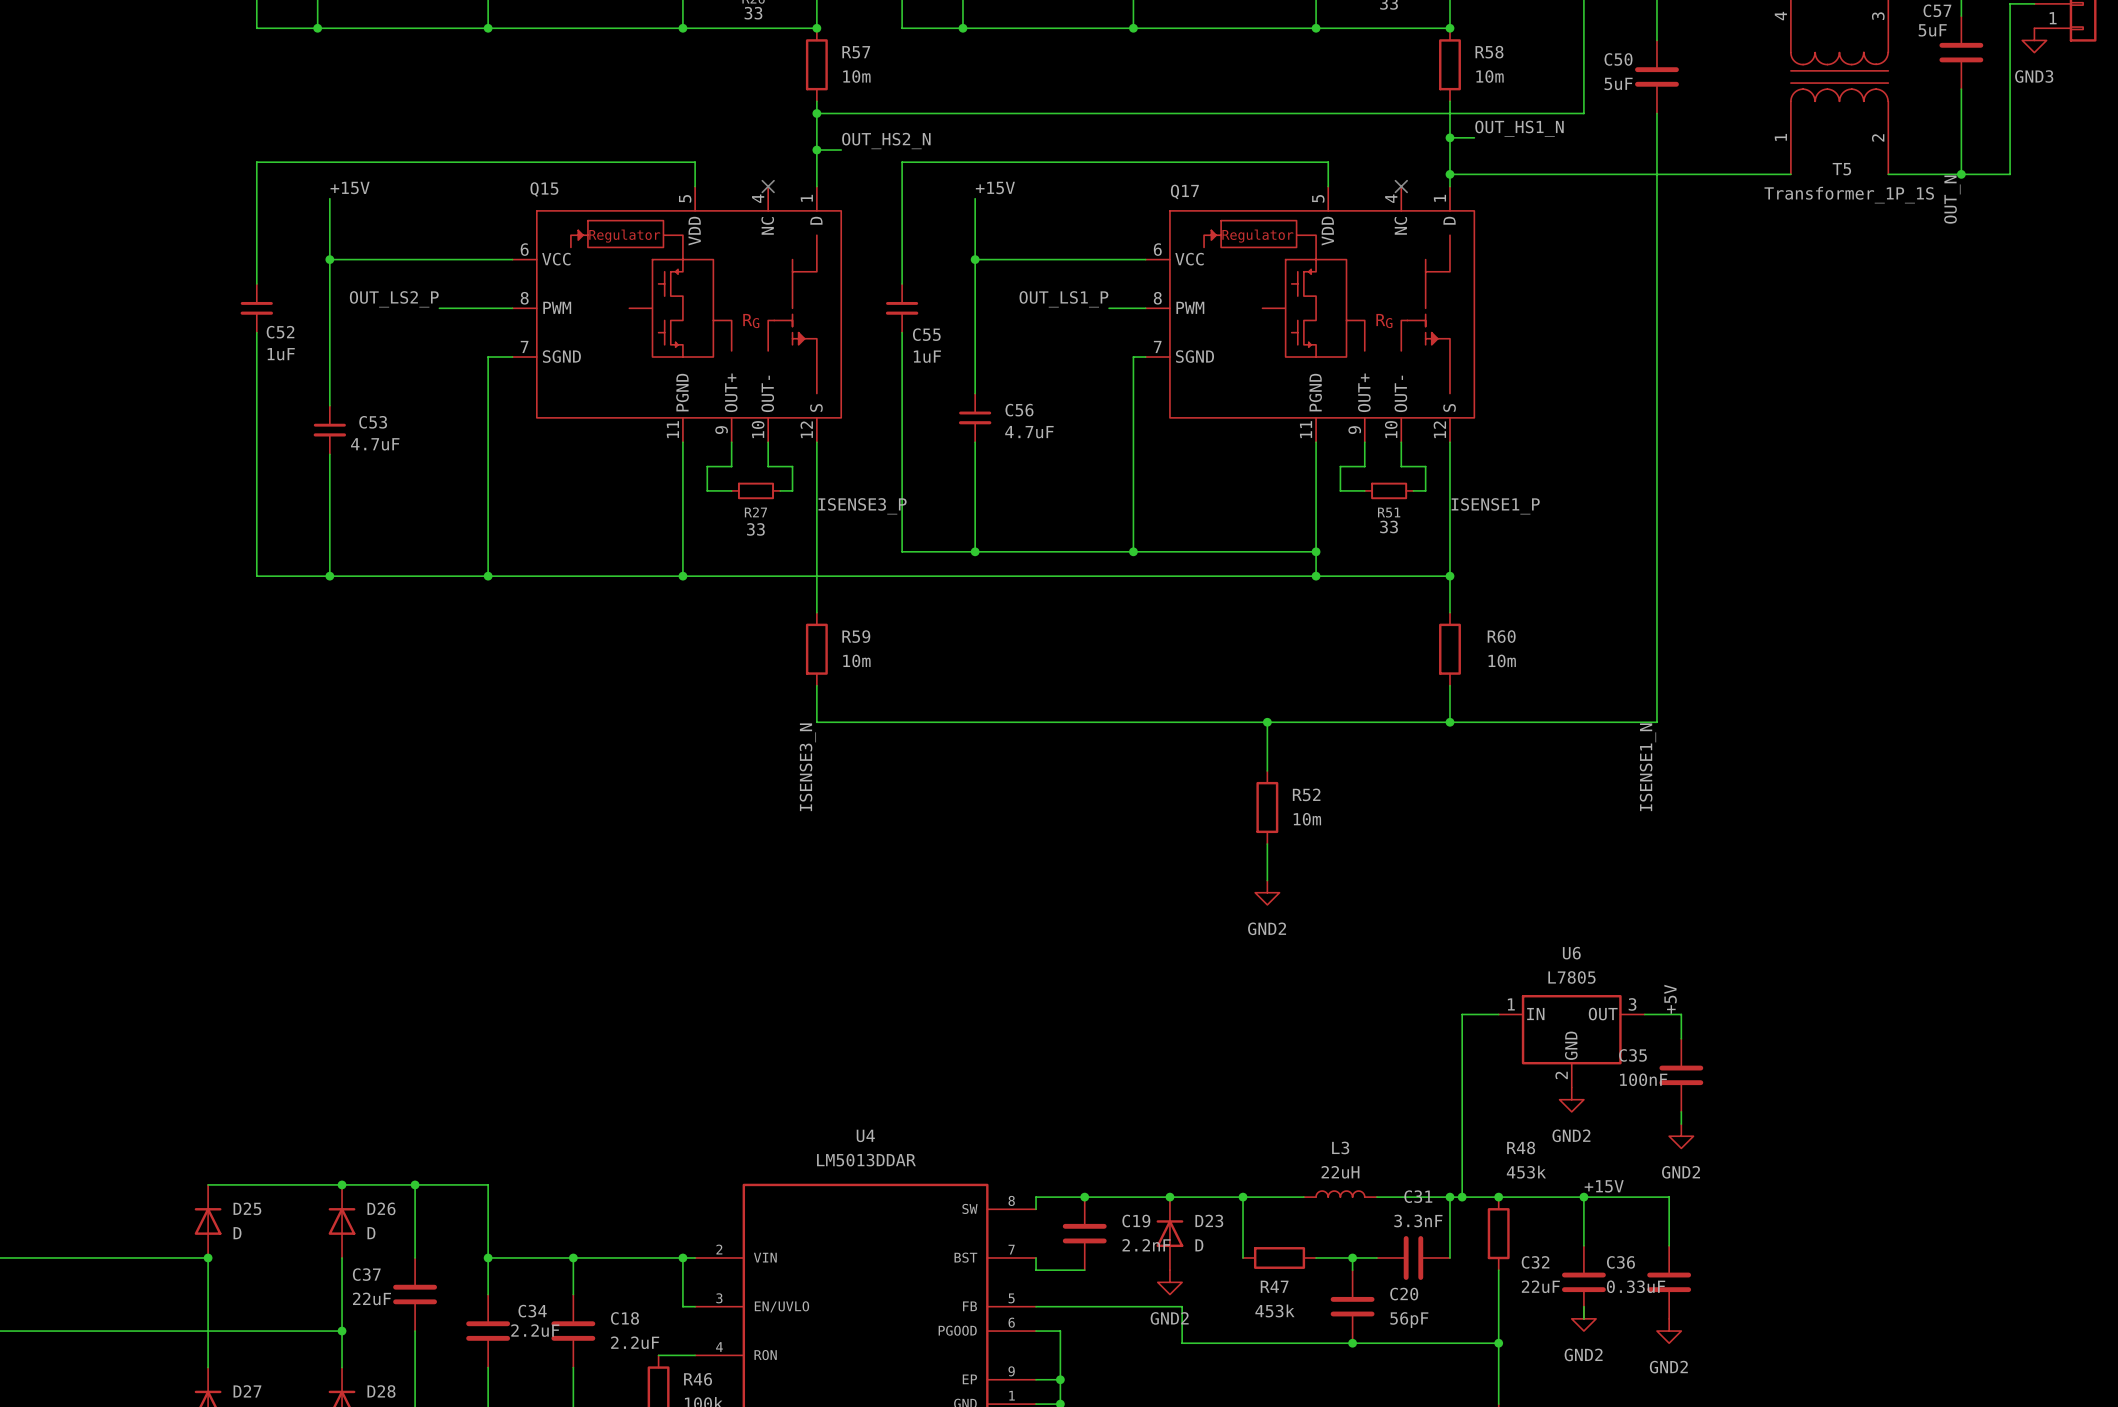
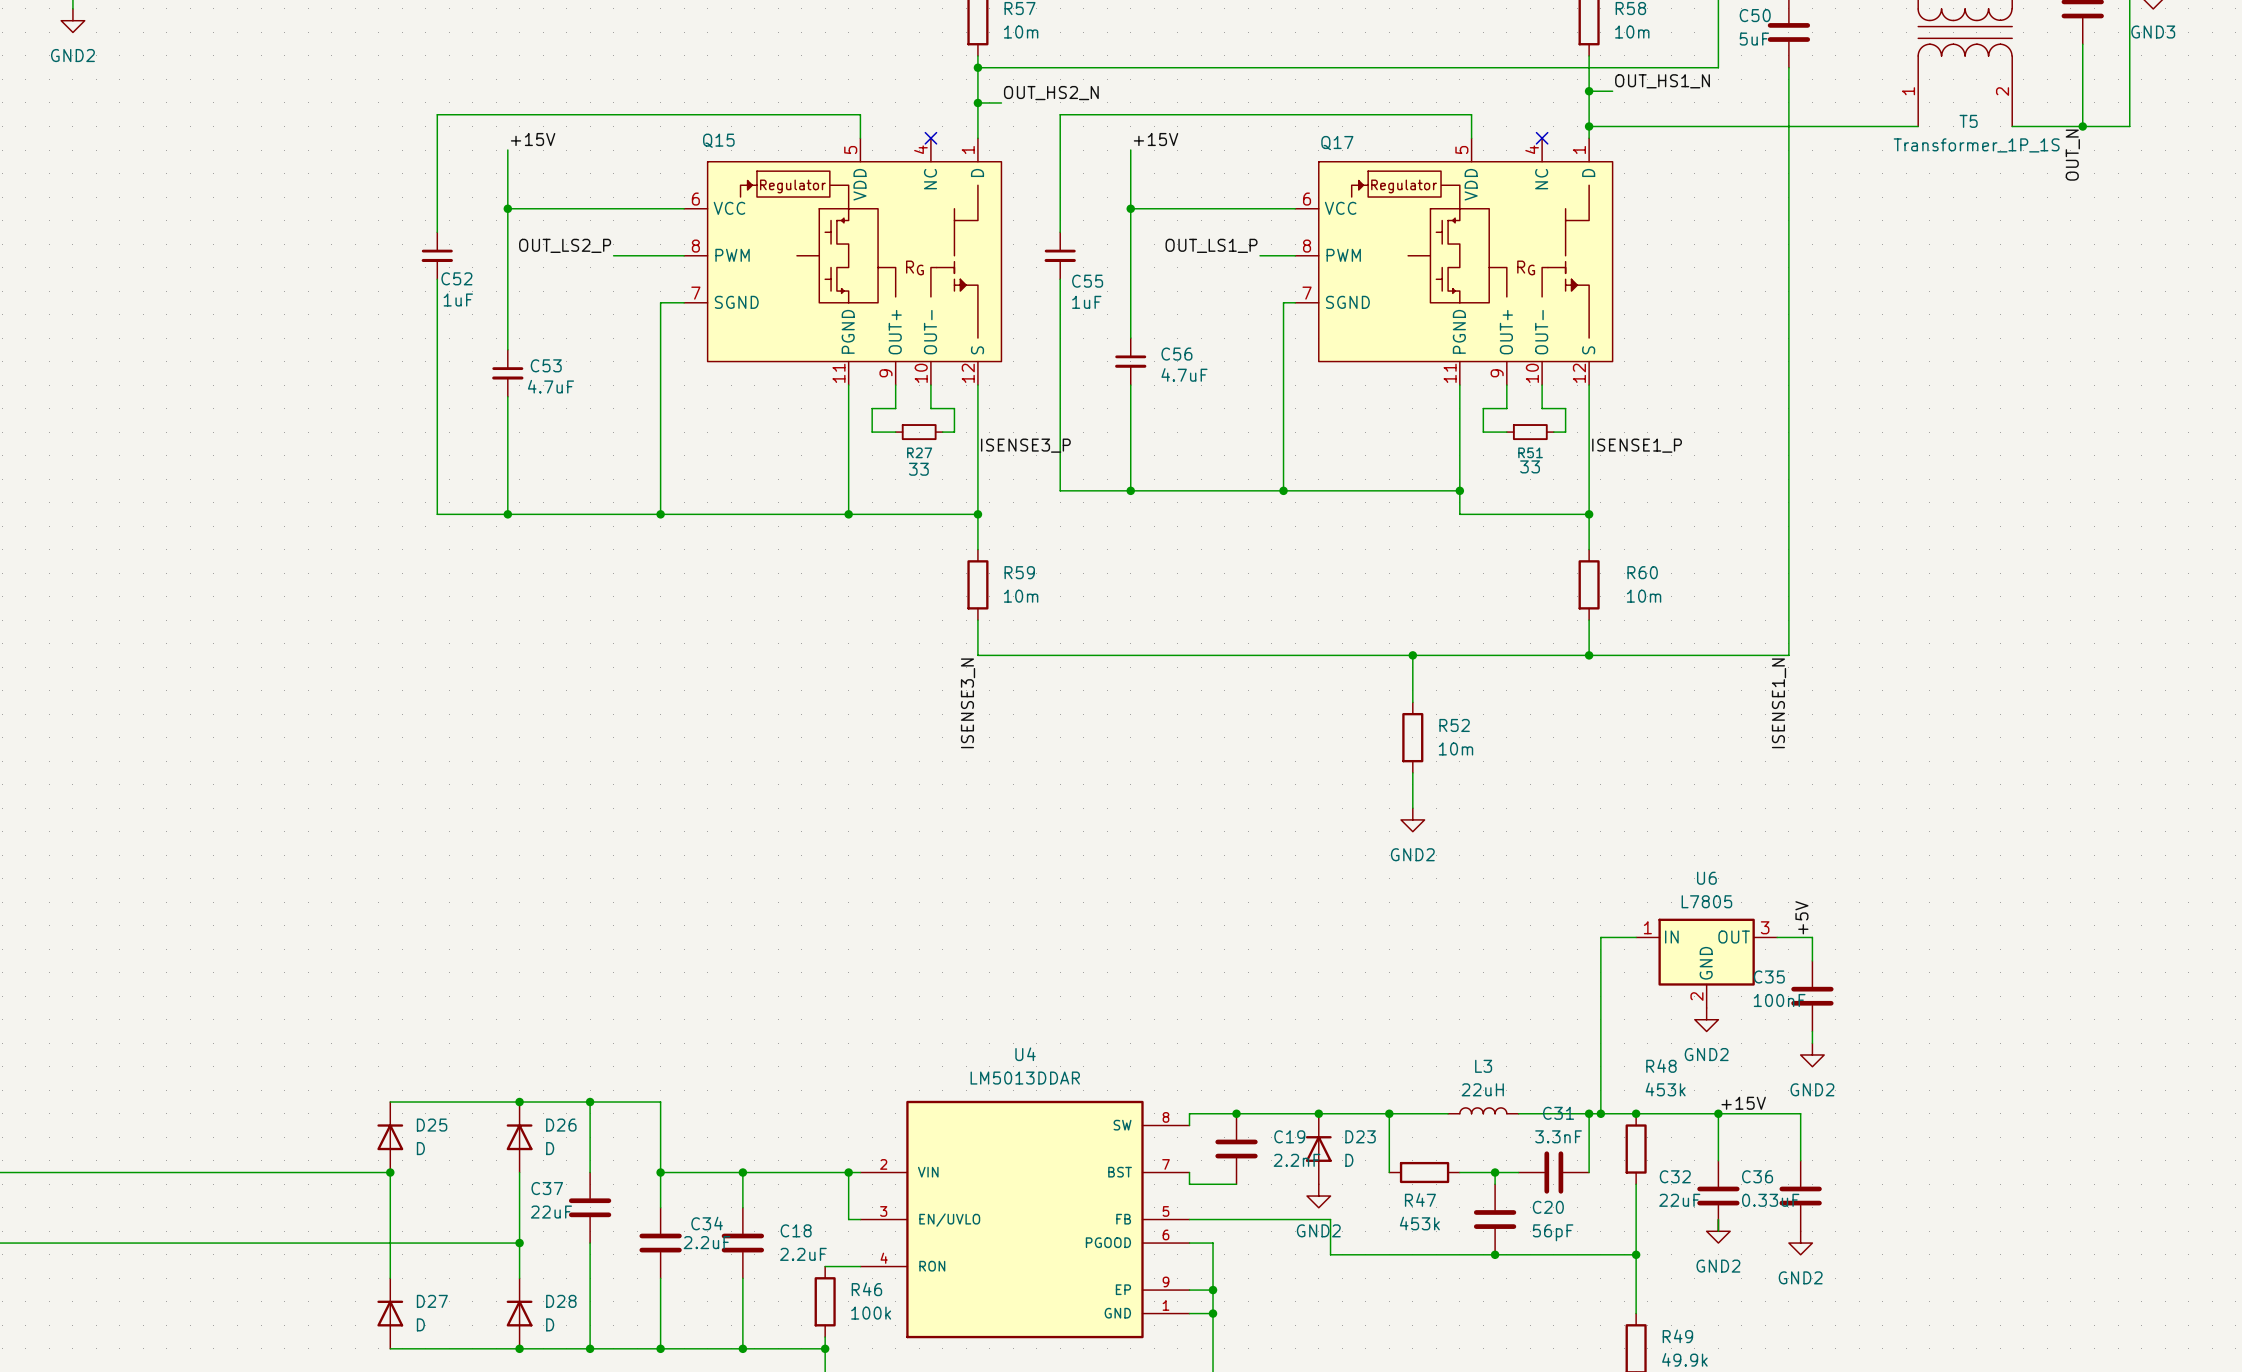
wire: (816, 576) (1316, 576) -> none
junction: none -> (977, 514)
junction: (1316, 576) -> none

